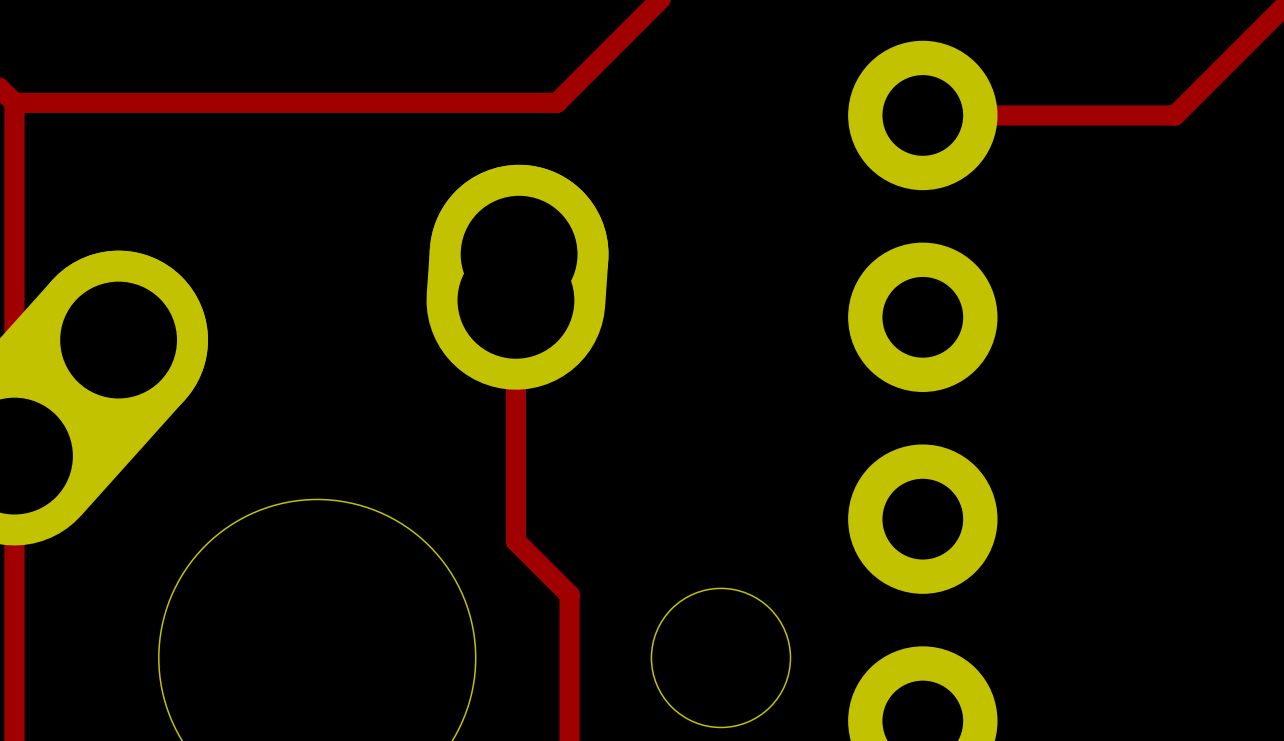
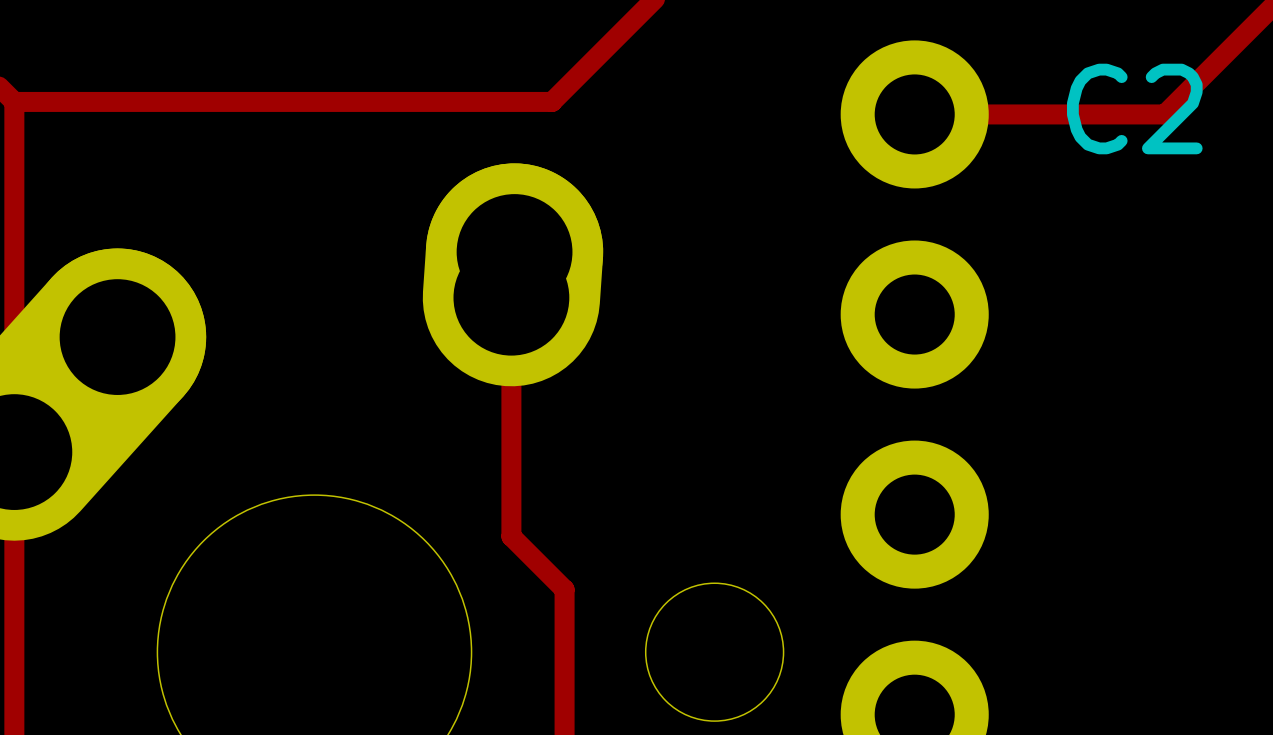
text: none -> C2 (1134, 109)

